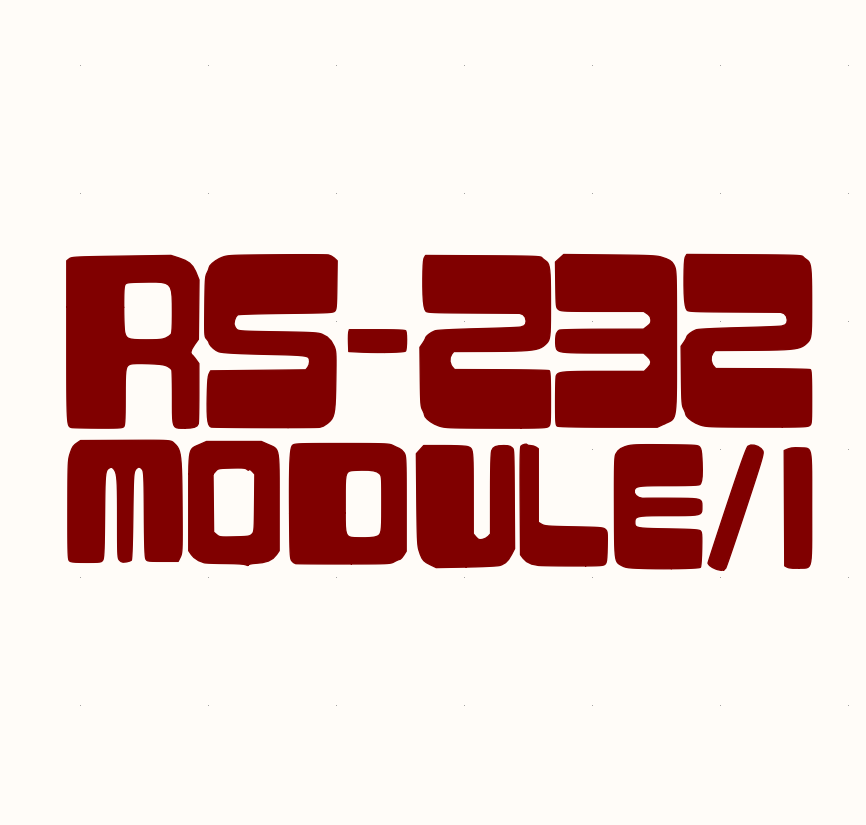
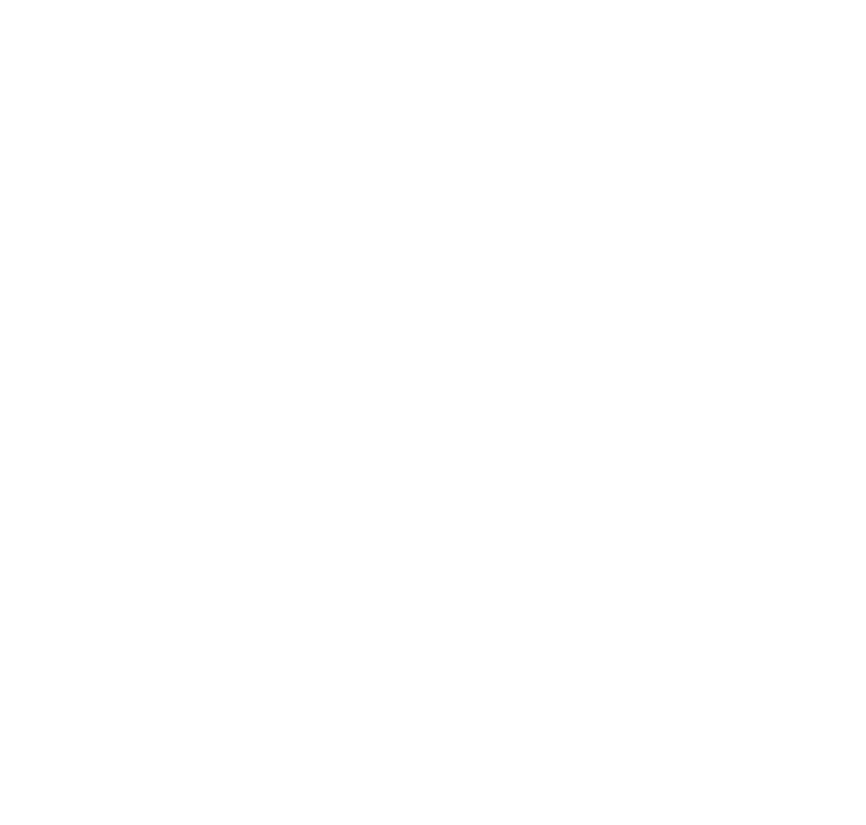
power symbol: (439, 412) -> none

